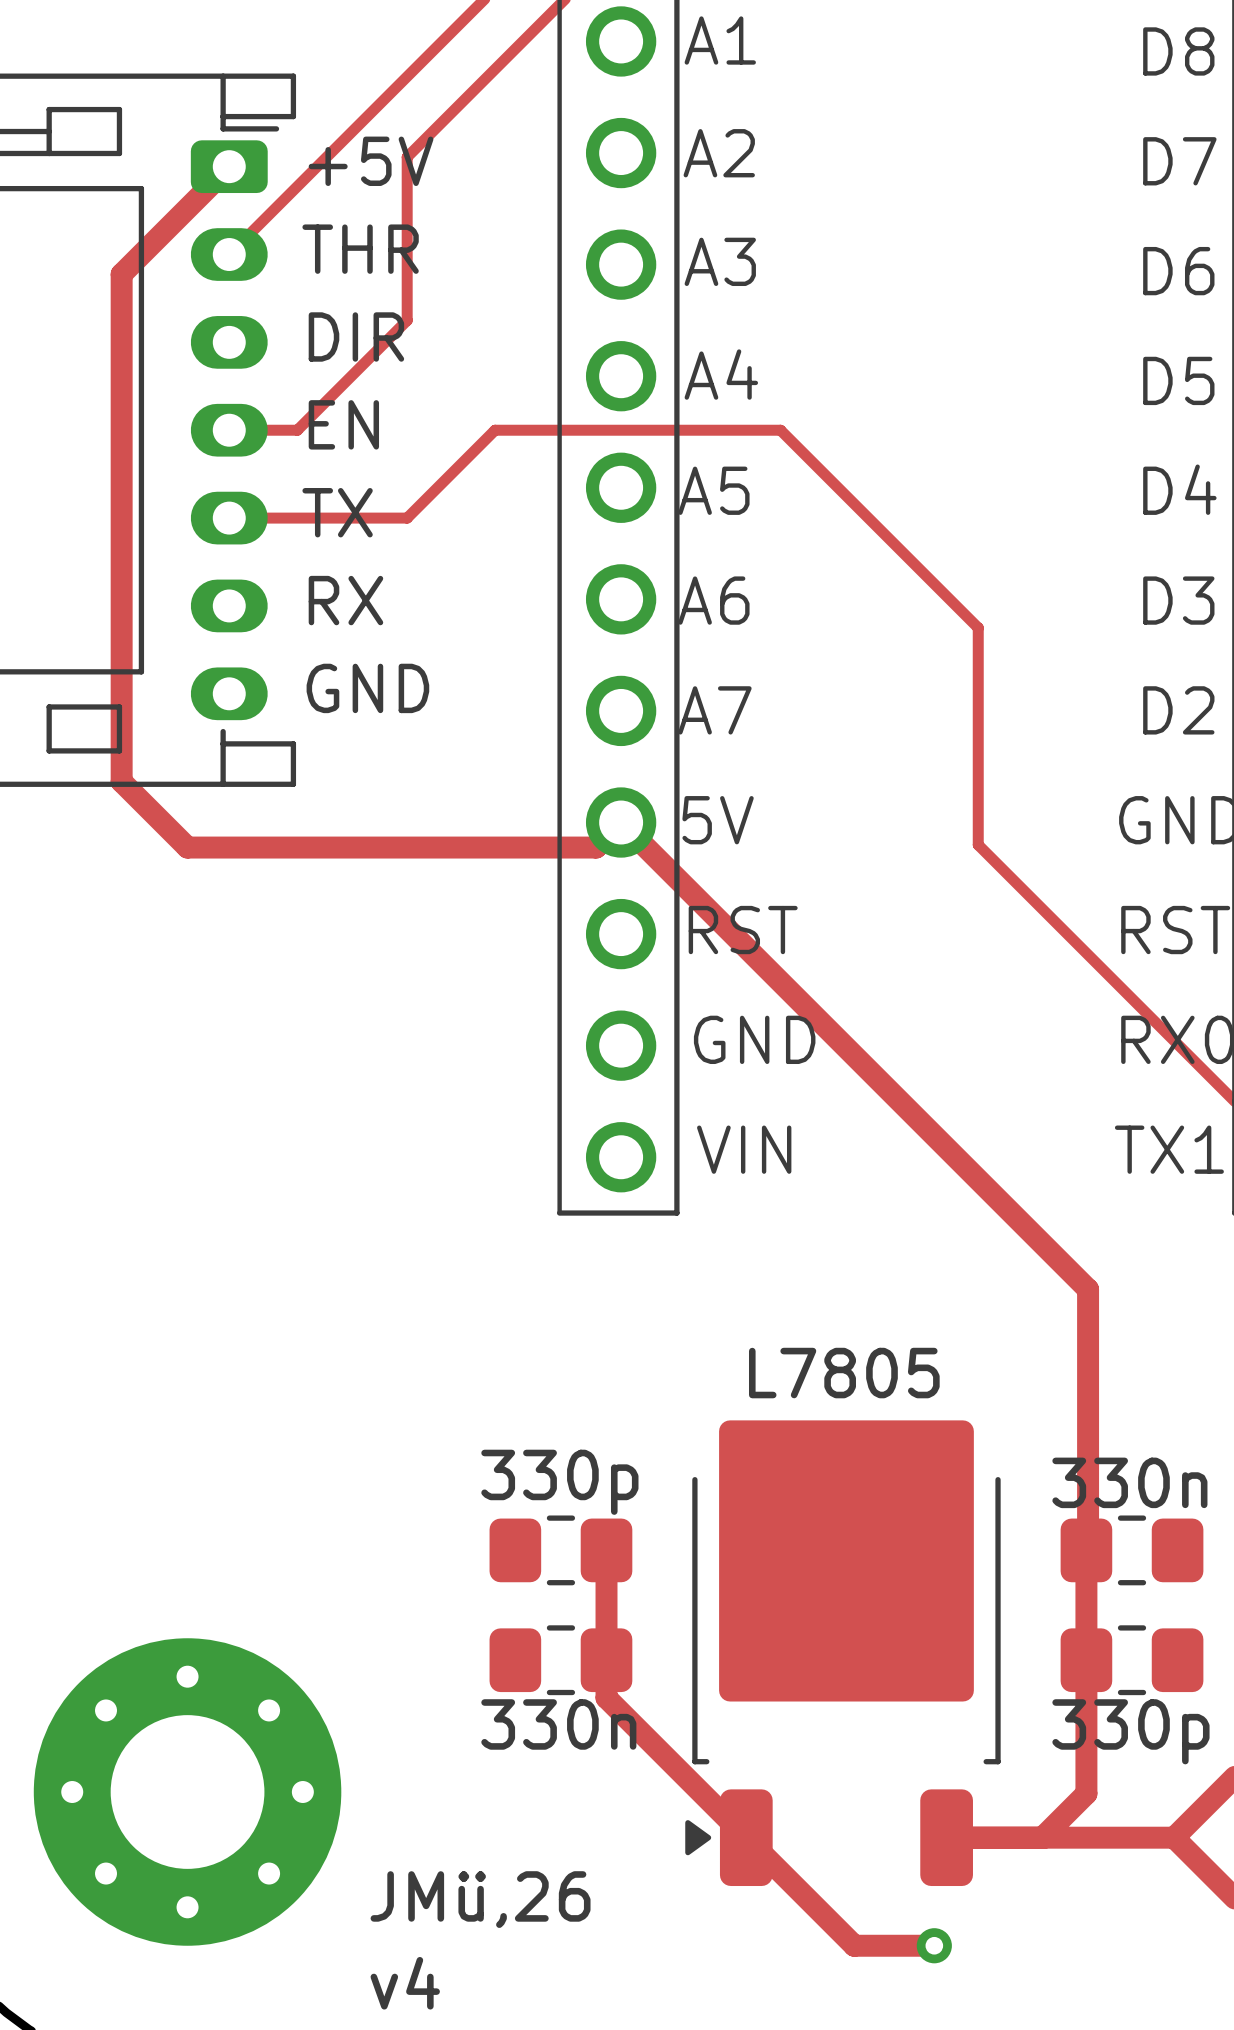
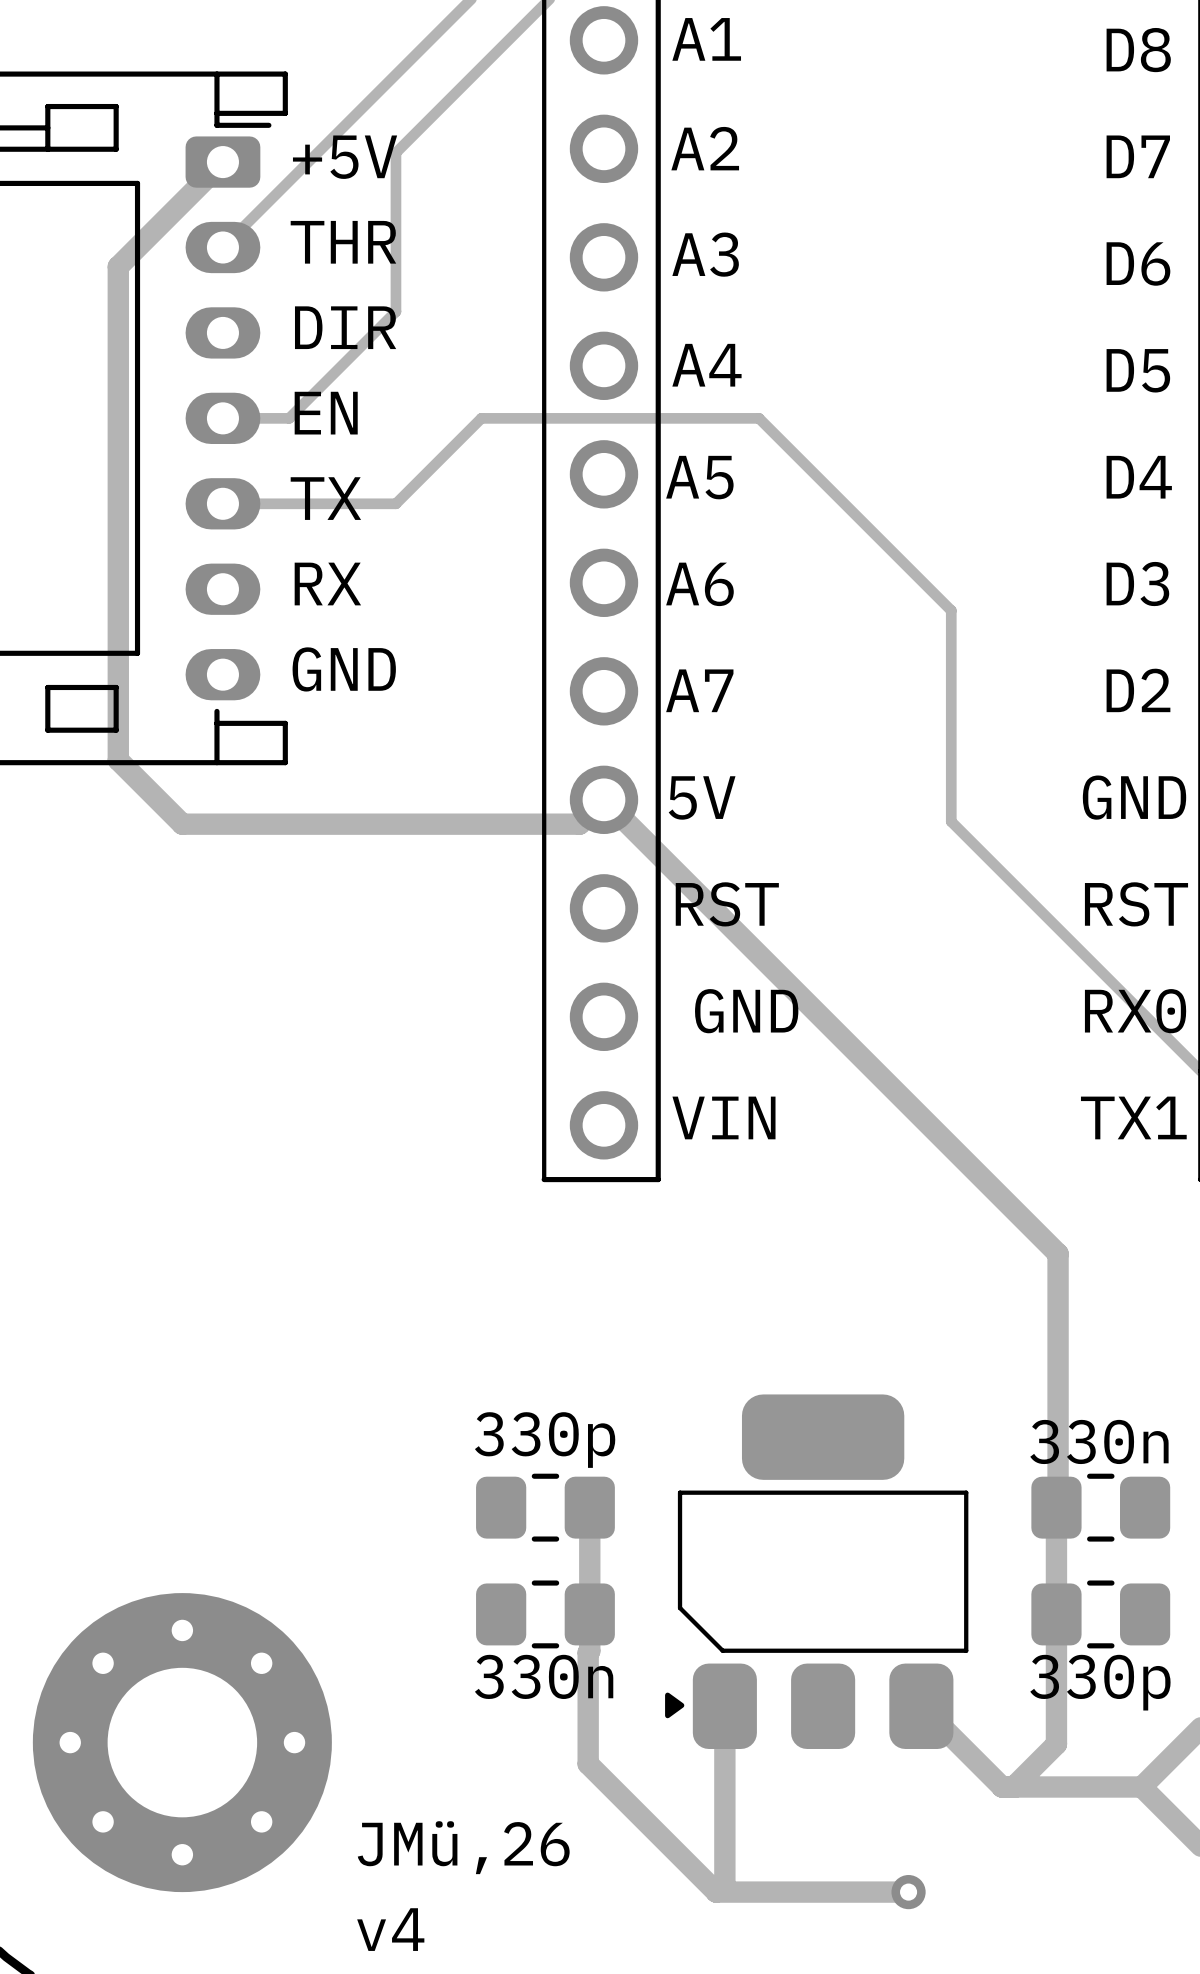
part value: L7805 (844, 1373) -> none
part footprint: [685, 1420, 1001, 1887] -> [665, 1394, 969, 1749]
track: (606, 1697) (854, 1945) -> (589, 1651) (588, 1652) (588, 1763) (716, 1892)
track: none -> (724, 1706) (724, 1883) (716, 1892)
track: (946, 1837) (1030, 1837) -> (921, 1706) (1002, 1787)
track: none -> (716, 1892) (830, 1892)

